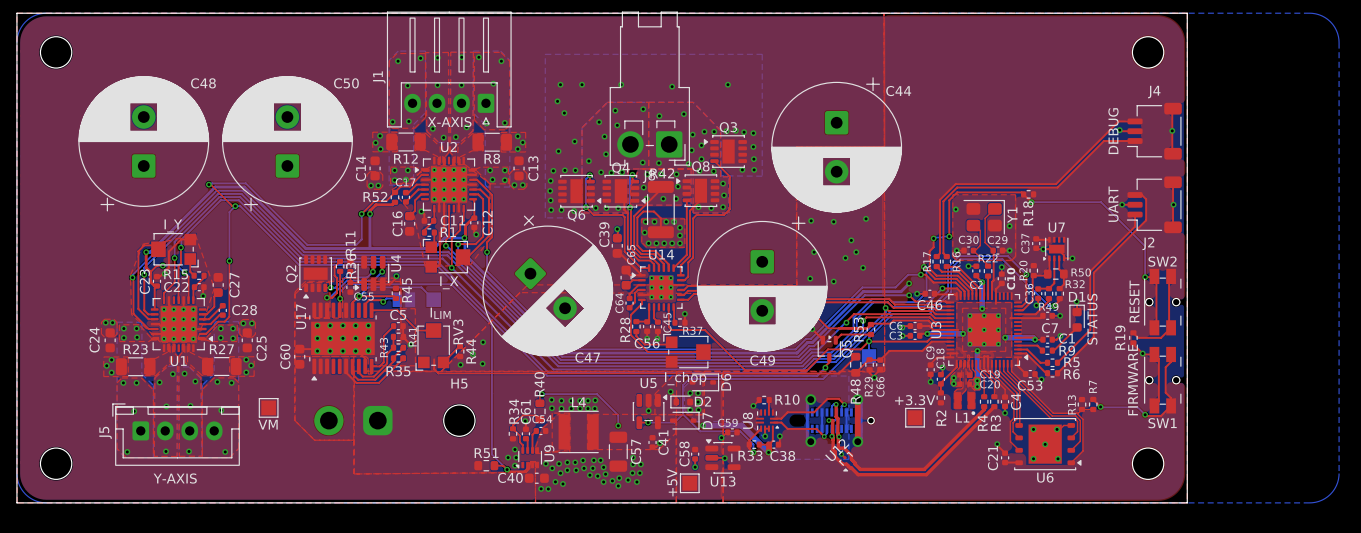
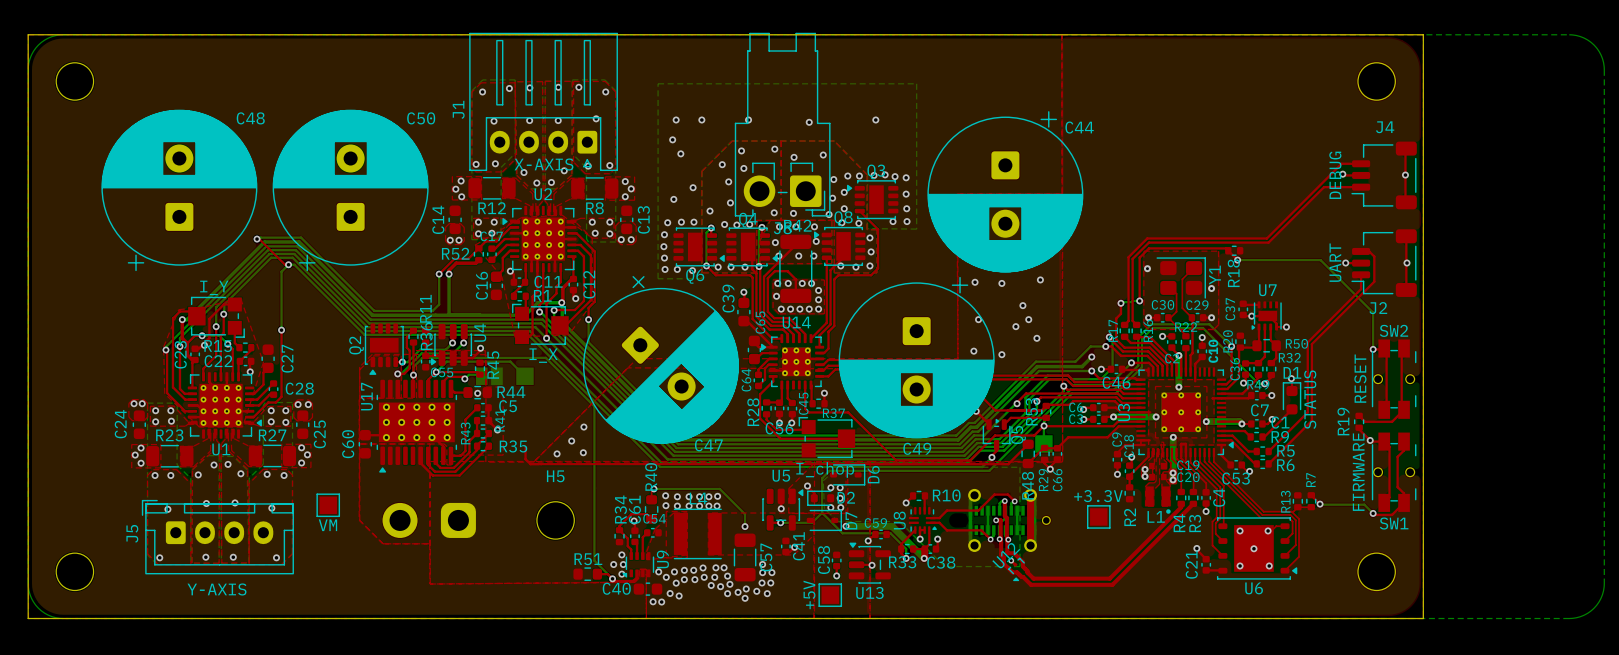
top track: (371, 310) (397, 310) (417, 330) (433, 330) -> (450, 388) (454, 392) (468, 392)
via: none -> (477, 393)
C5 name position: C5 (398, 314) -> C5 (508, 406)
R44 footprint: [455, 343, 465, 360] -> [463, 385, 492, 400]
RV3: ILIM (432, 346) -> none
top track: (459, 346) (443, 362) -> none
R35 name position: R35 (398, 371) -> R35 (513, 446)

